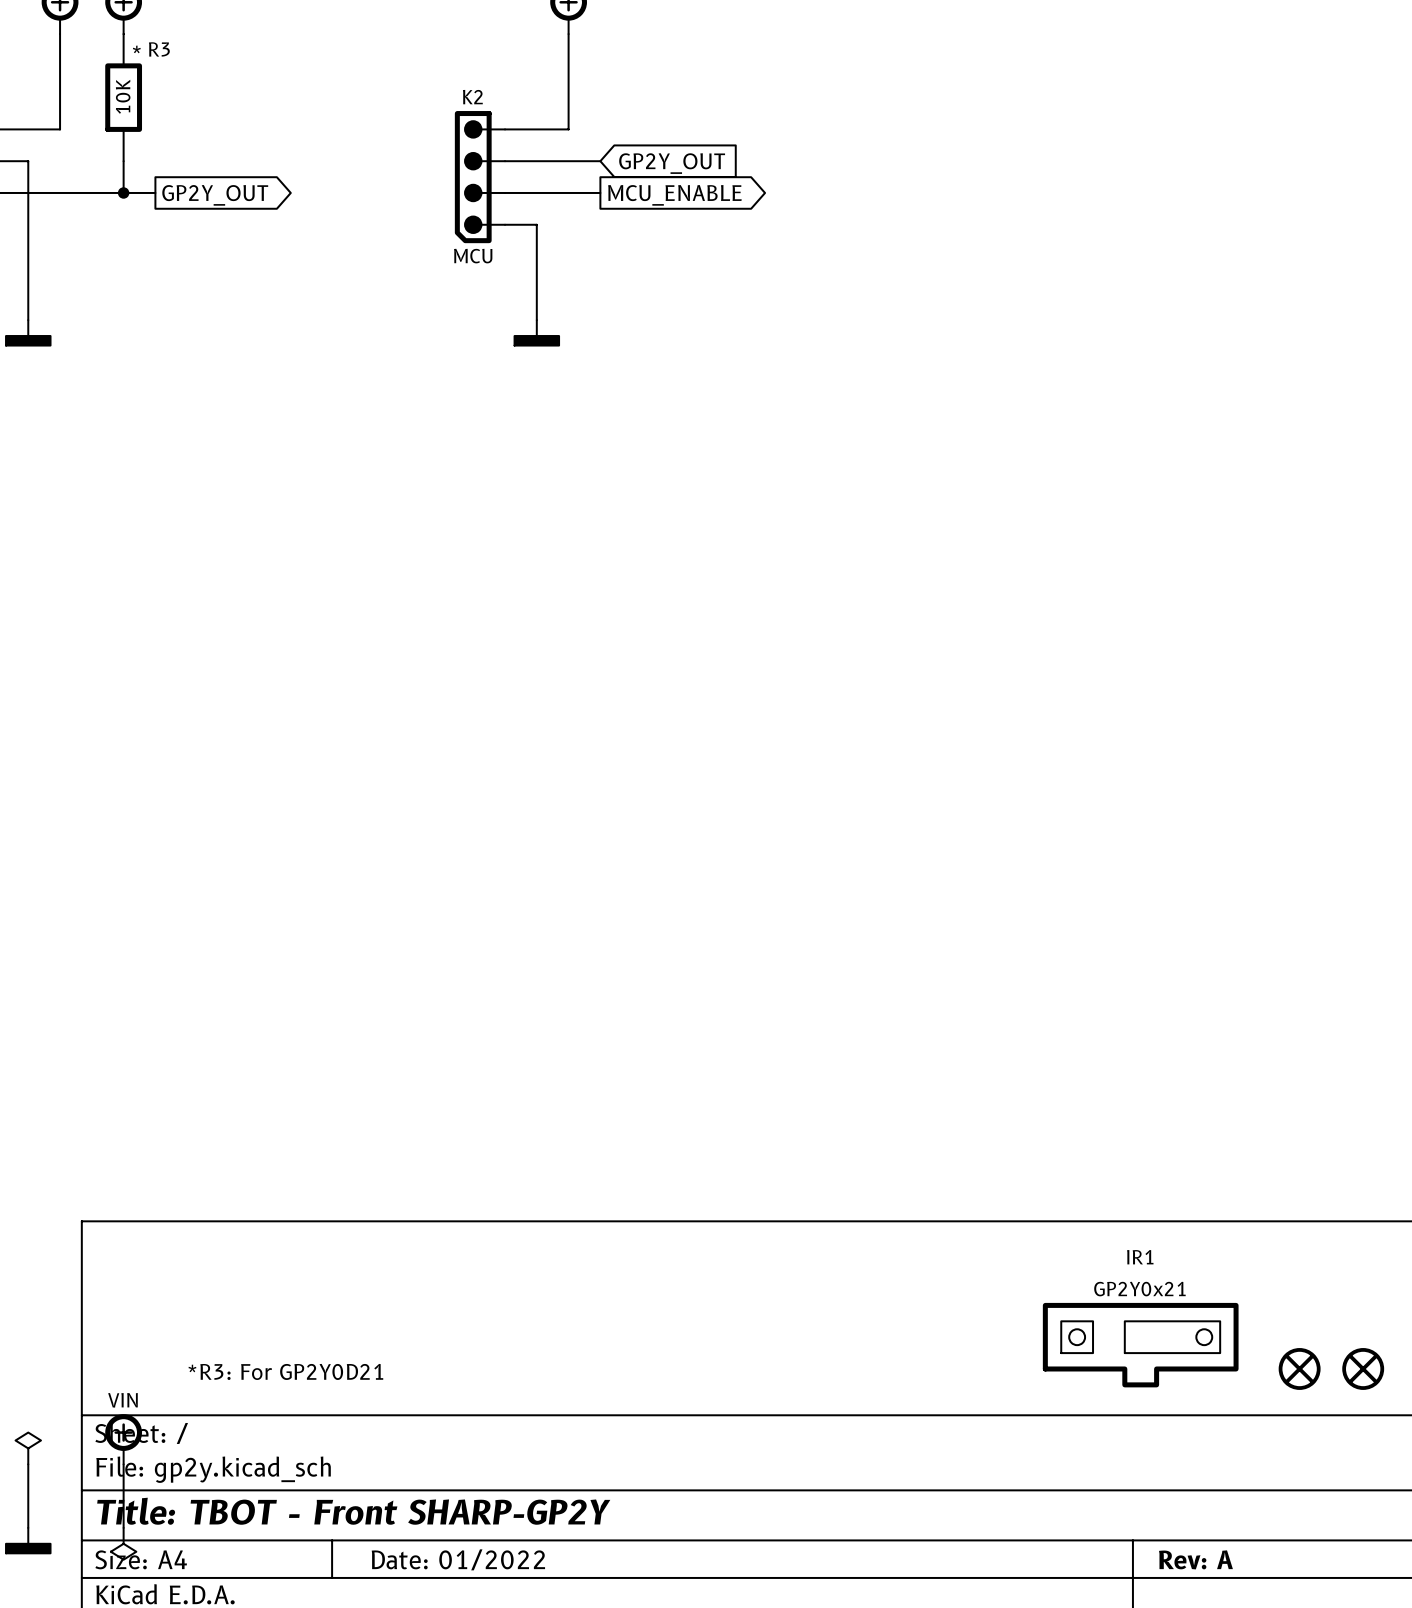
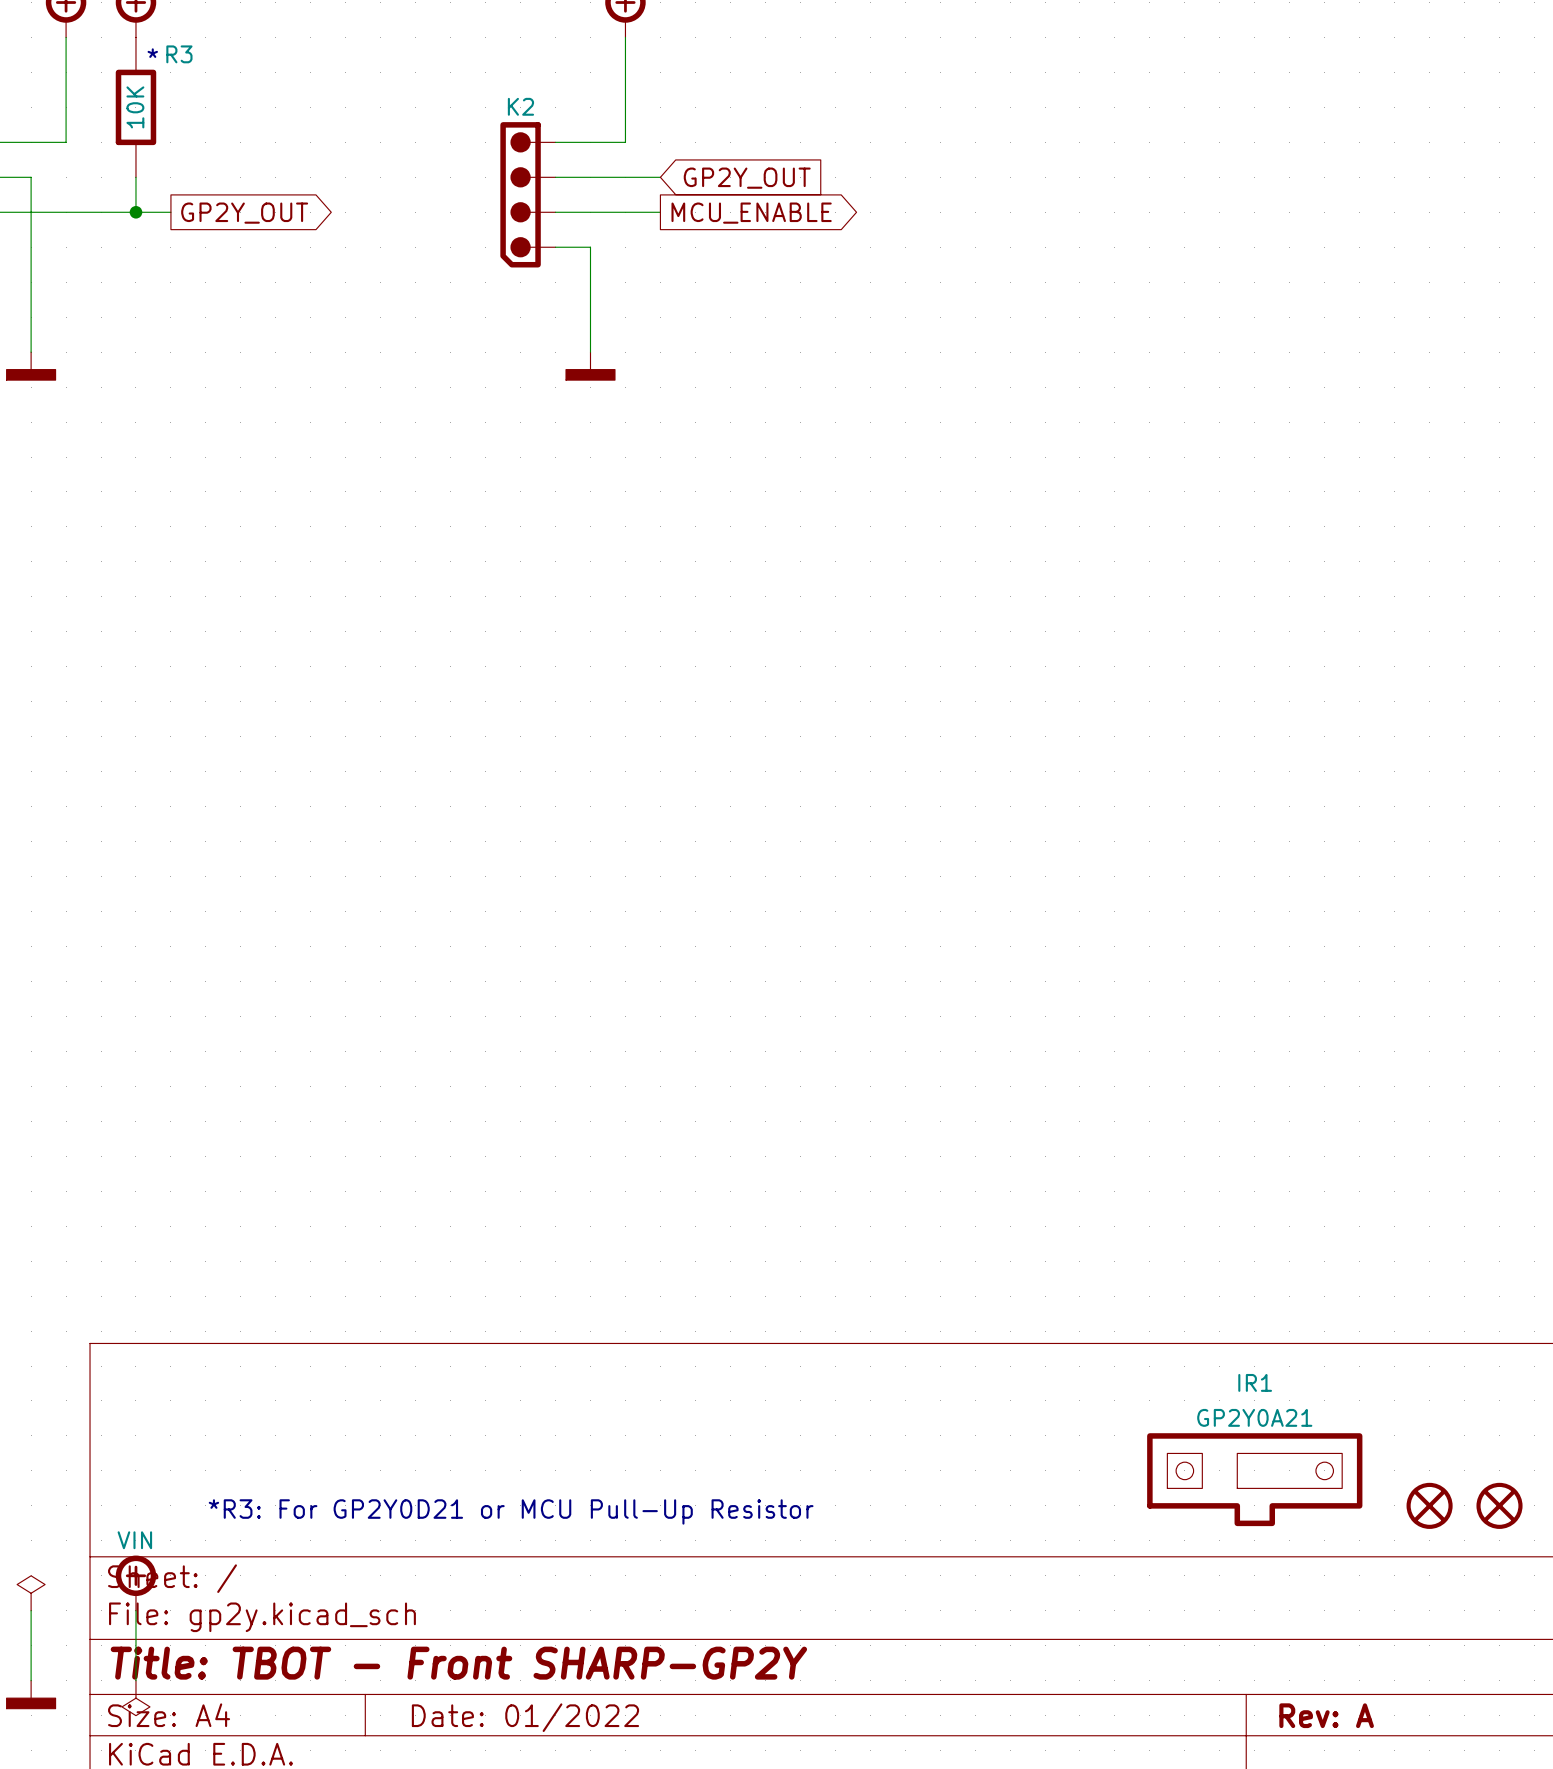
K2 value: MCU (473, 256) -> none
IR1 text: GP2Y0x21 (1139, 1289) -> GP2Y0A21 (1254, 1417)
text: *R3: For GP2Y0D21 (285, 1371) -> *R3: For GP2Y0D21 or MCU Pull-Up Resistor (511, 1511)

